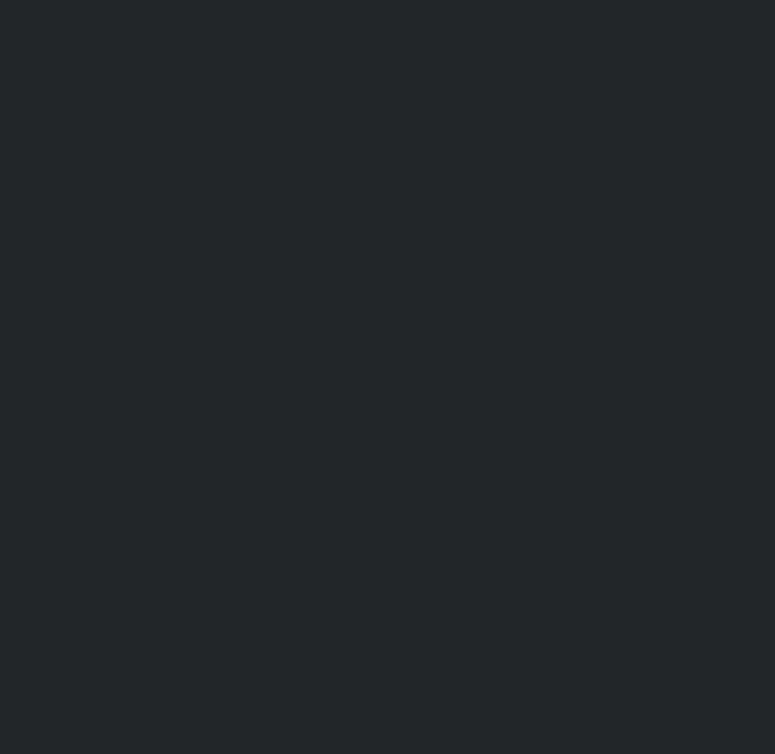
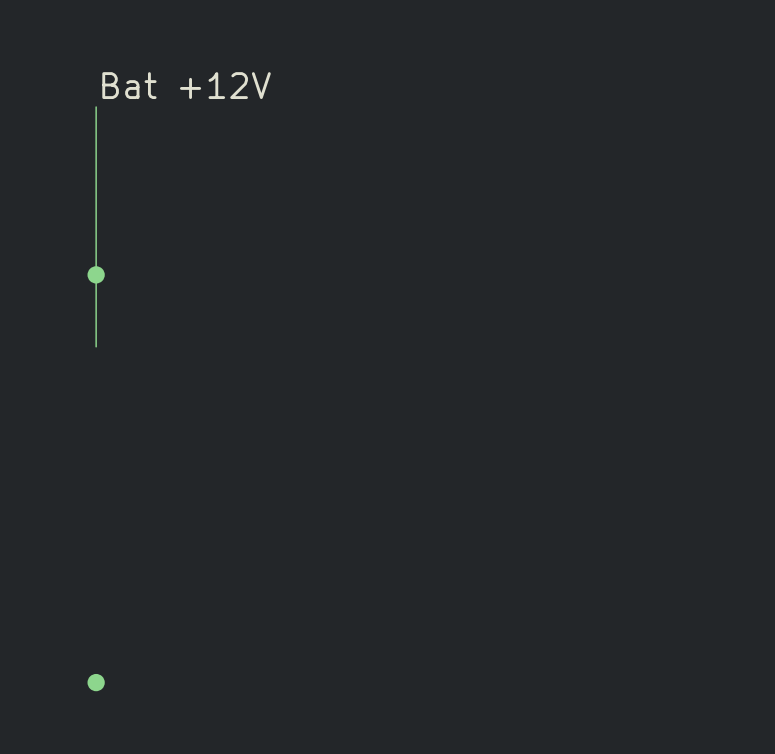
label: none -> Bat +12V (186, 85)
wire: none -> (96, 106) (96, 346)
junction: none -> (96, 274)
junction: none -> (96, 682)

